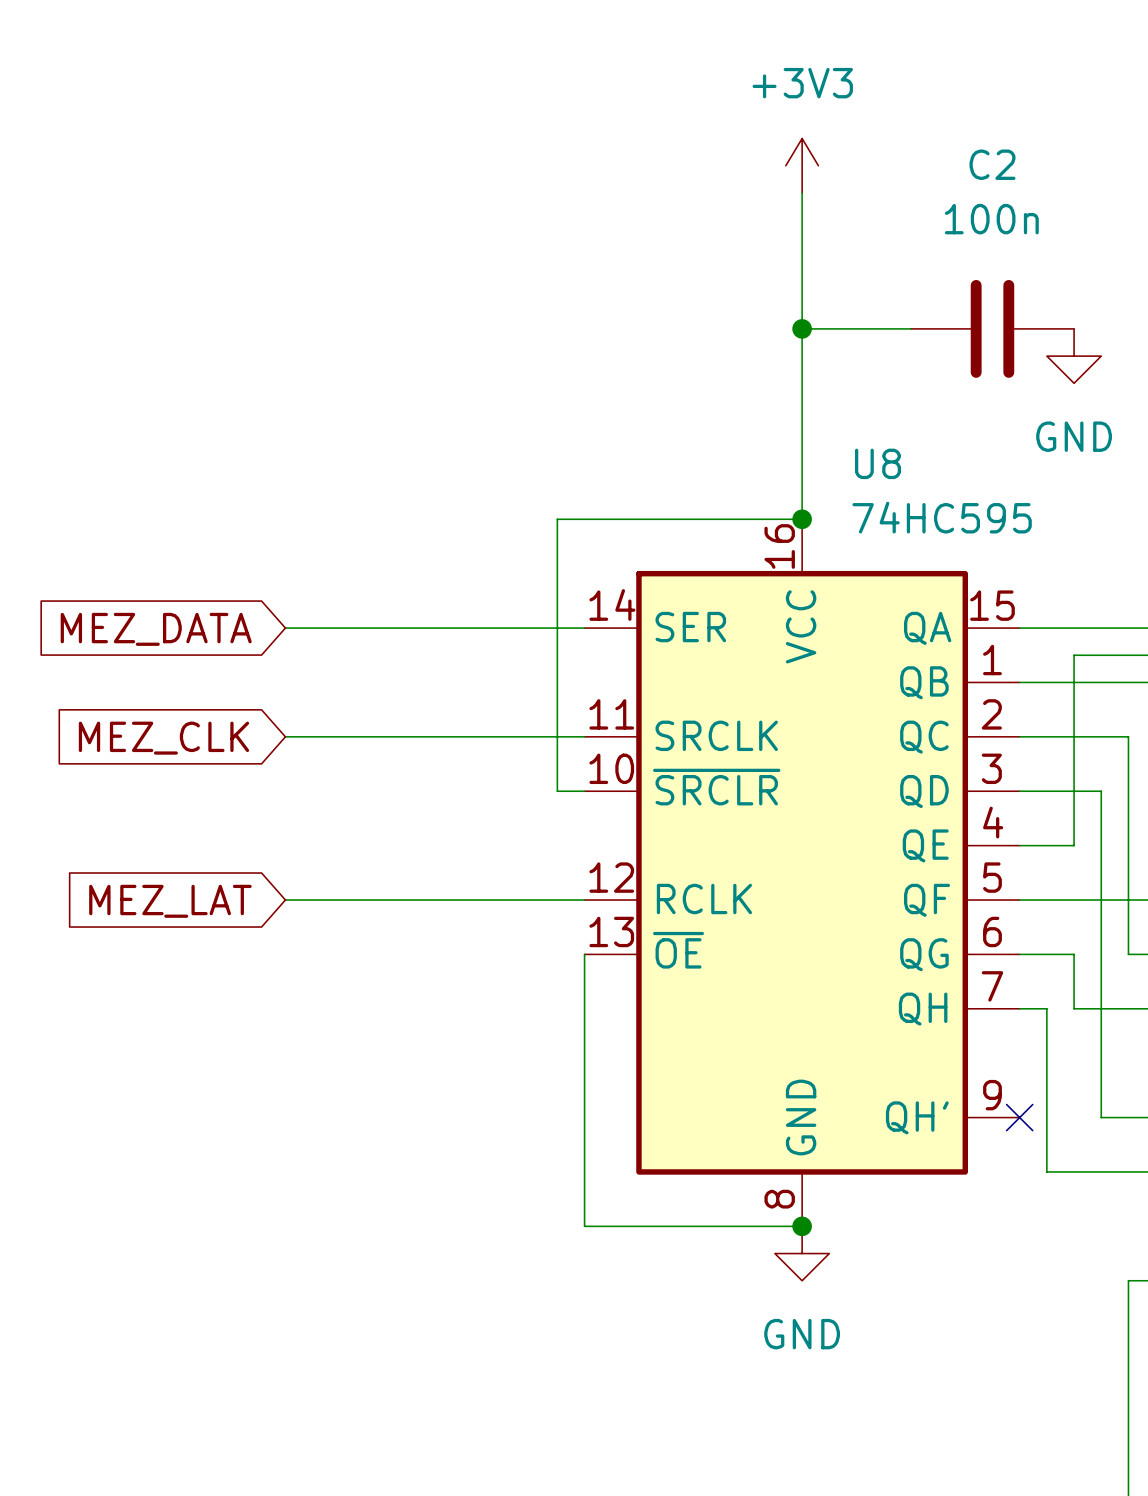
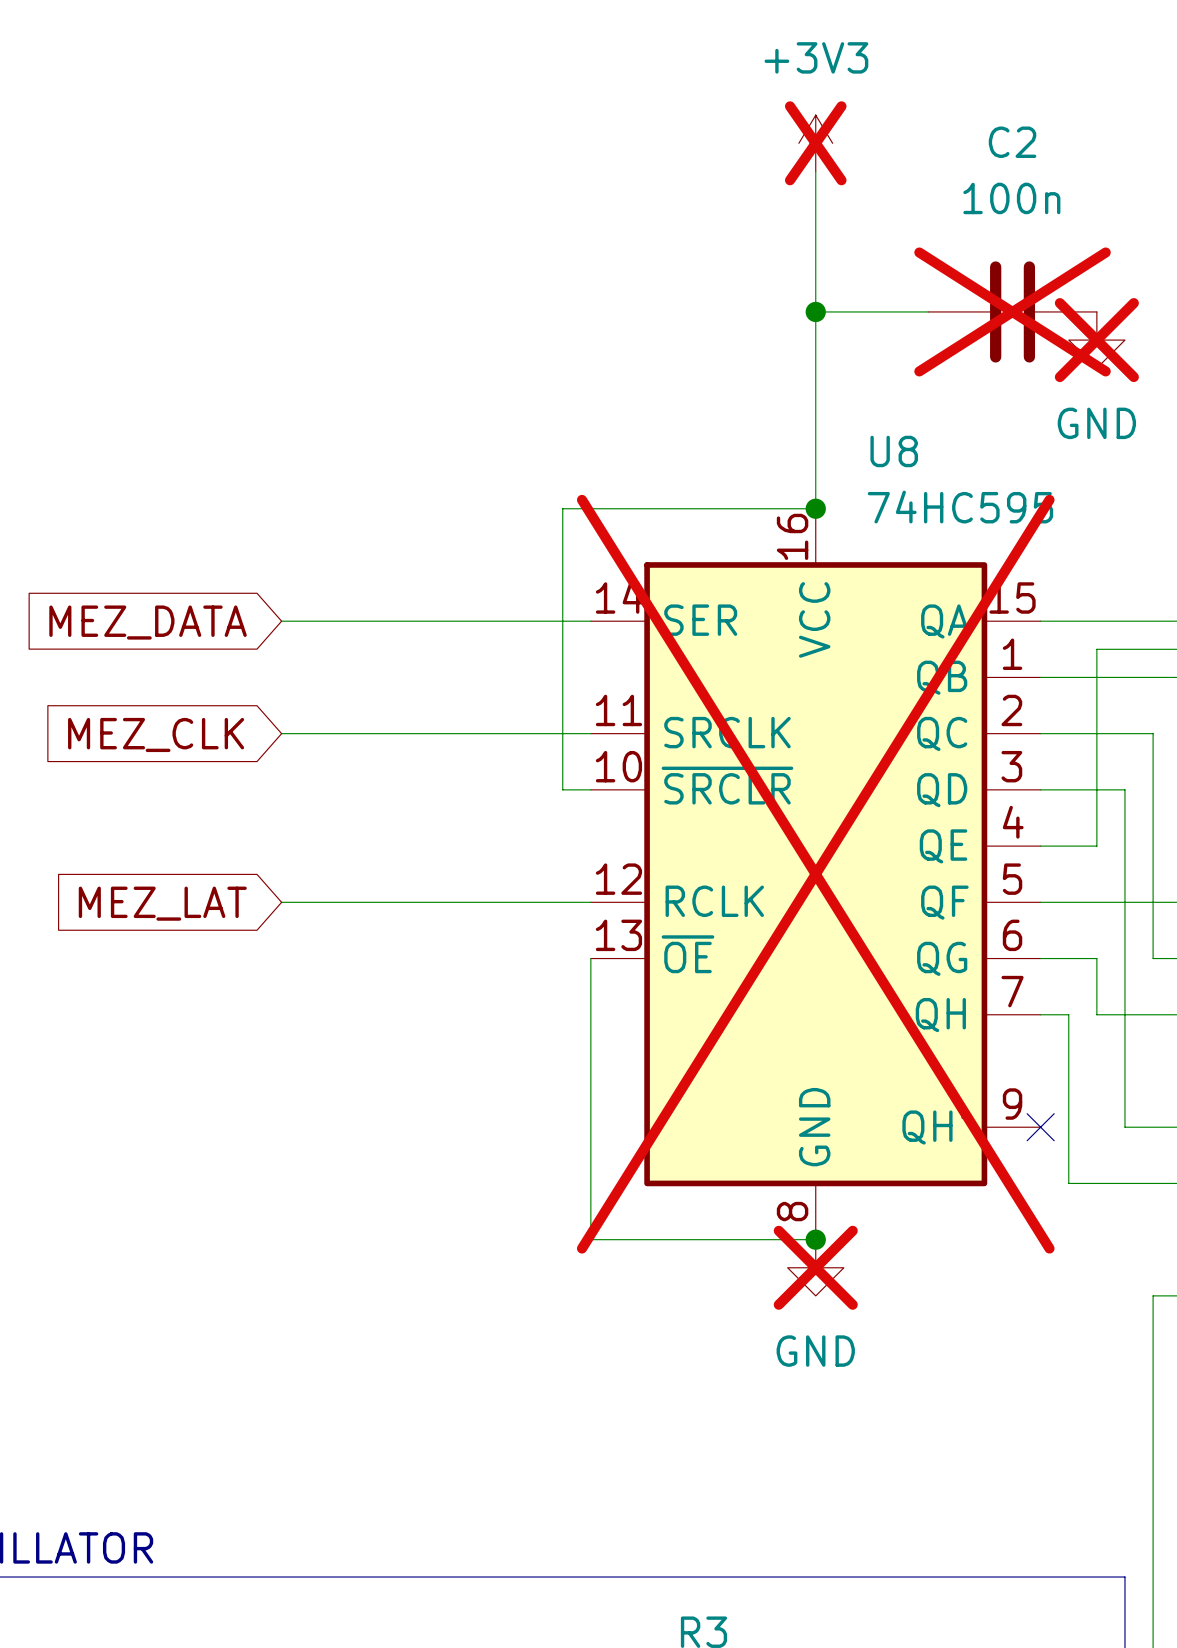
power symbol do-not-place cross: none -> (815, 143)
C2 do-not-place cross: none -> (1012, 311)
power symbol do-not-place cross: none -> (1096, 340)
U8 do-not-place cross: none -> (815, 874)
power symbol do-not-place cross: none -> (815, 1267)

